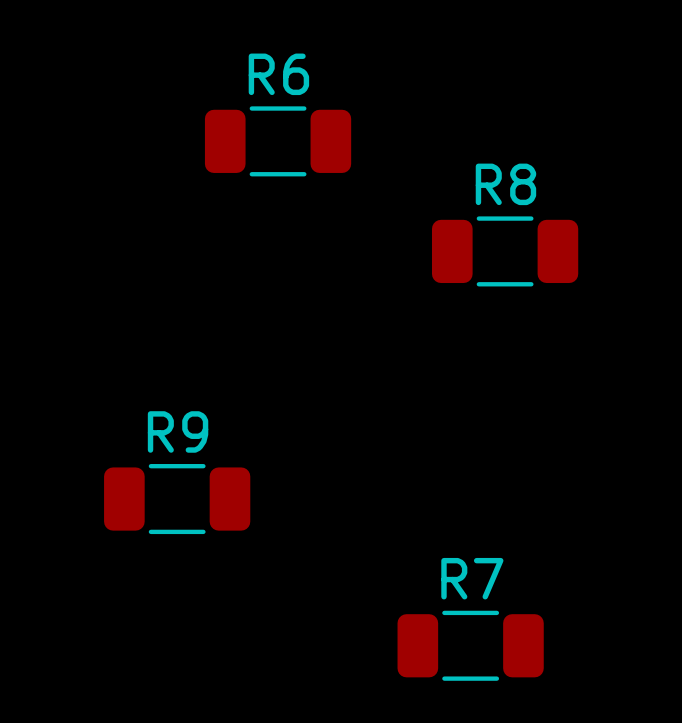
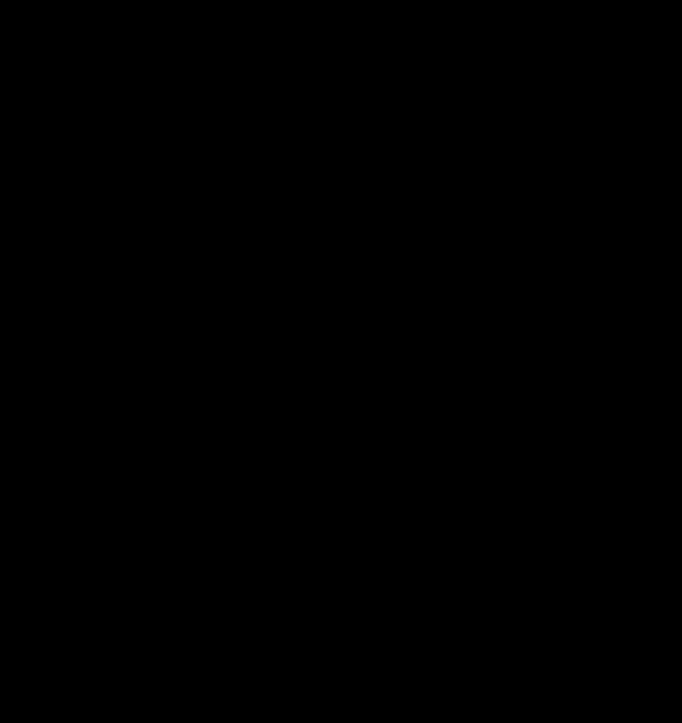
R6: (278, 141) -> none
R8: (505, 251) -> none
R9: (177, 499) -> none
R7: (470, 645) -> none

